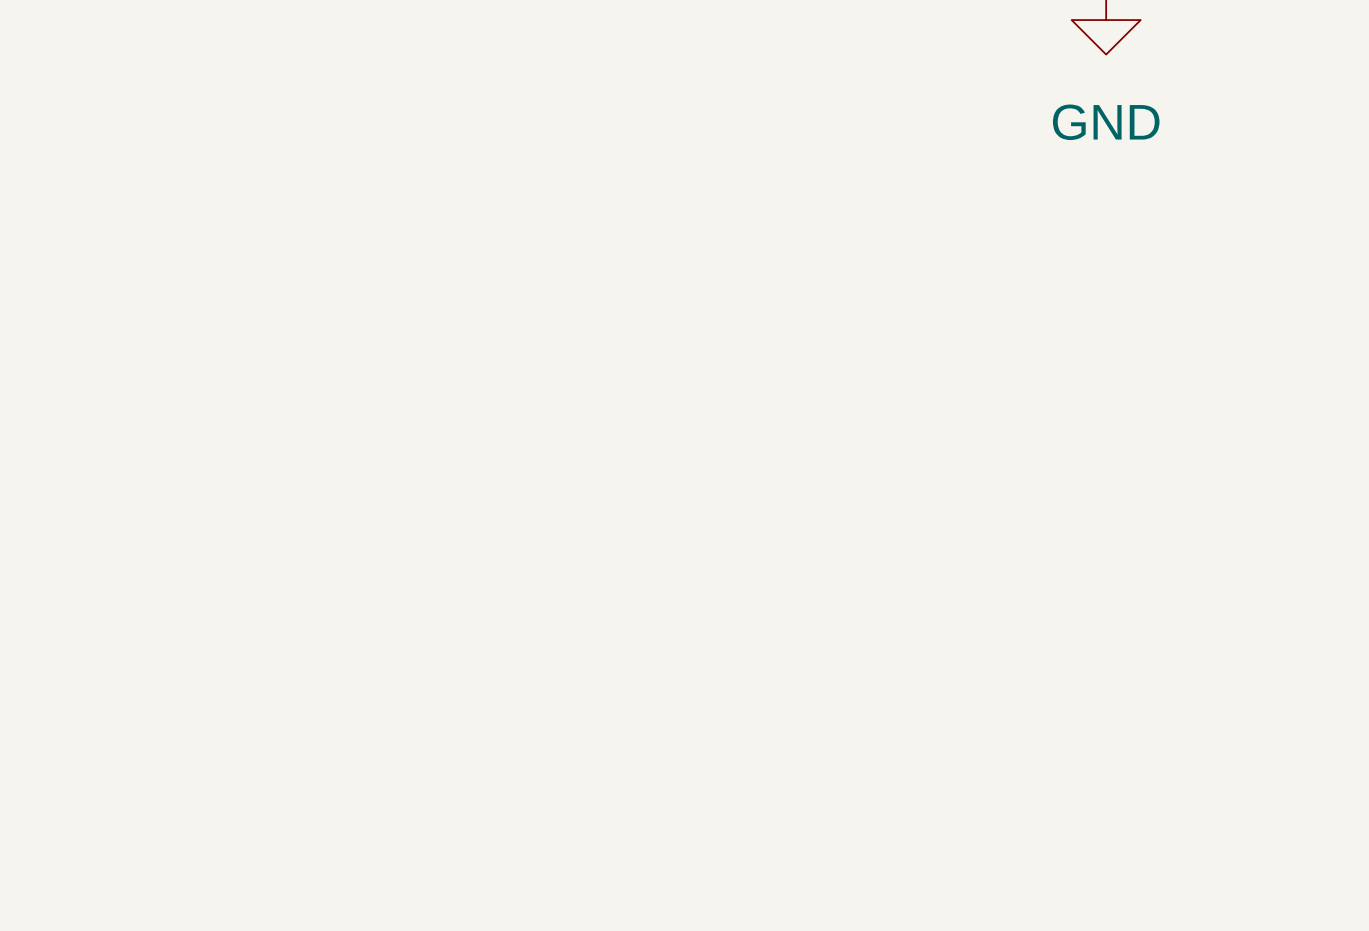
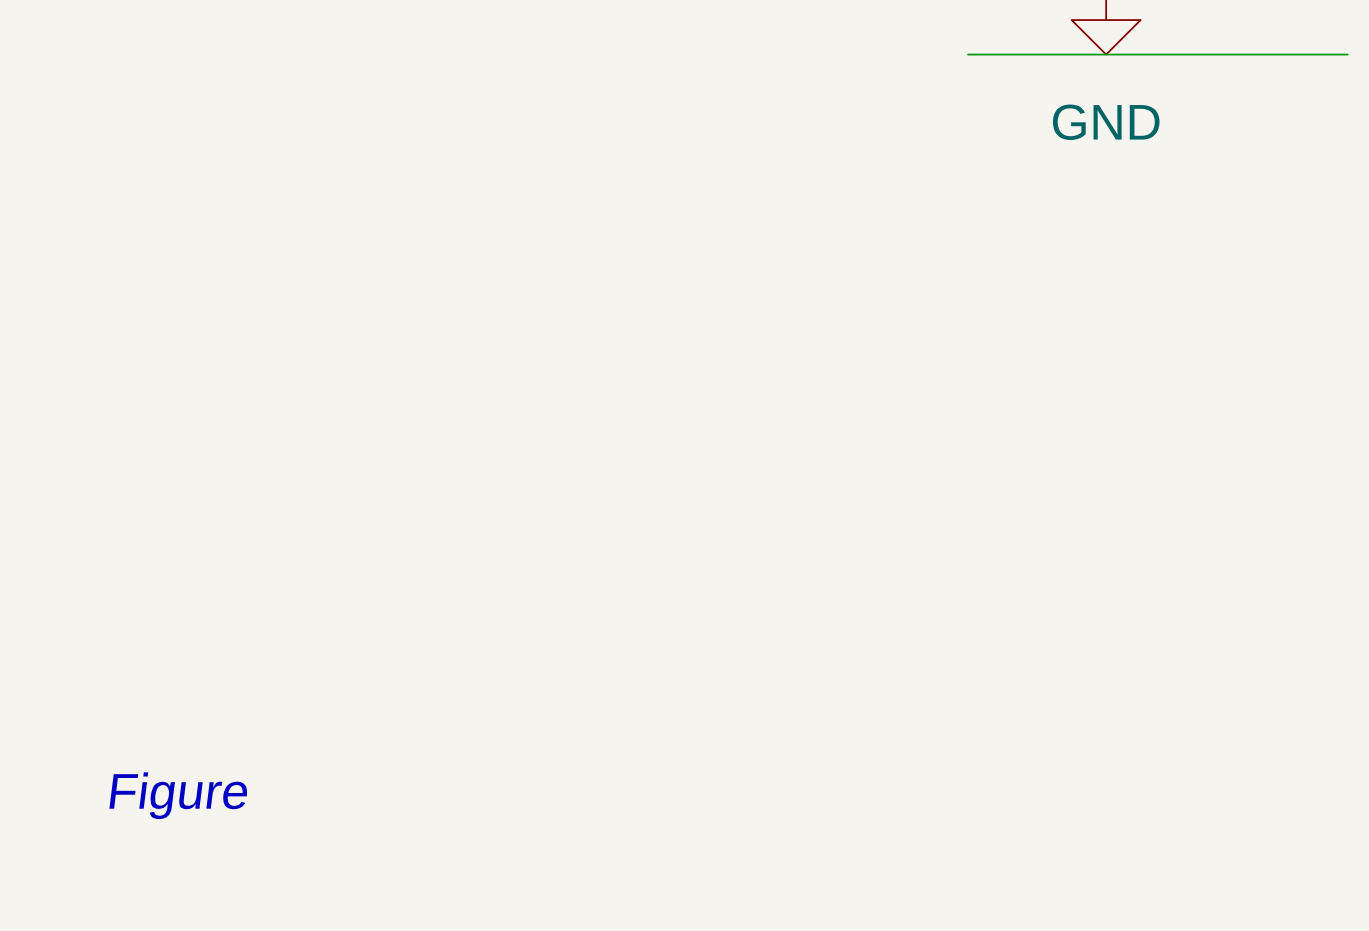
wire: none -> (968, 54) (1347, 54)
text: none -> Figure (179, 795)

